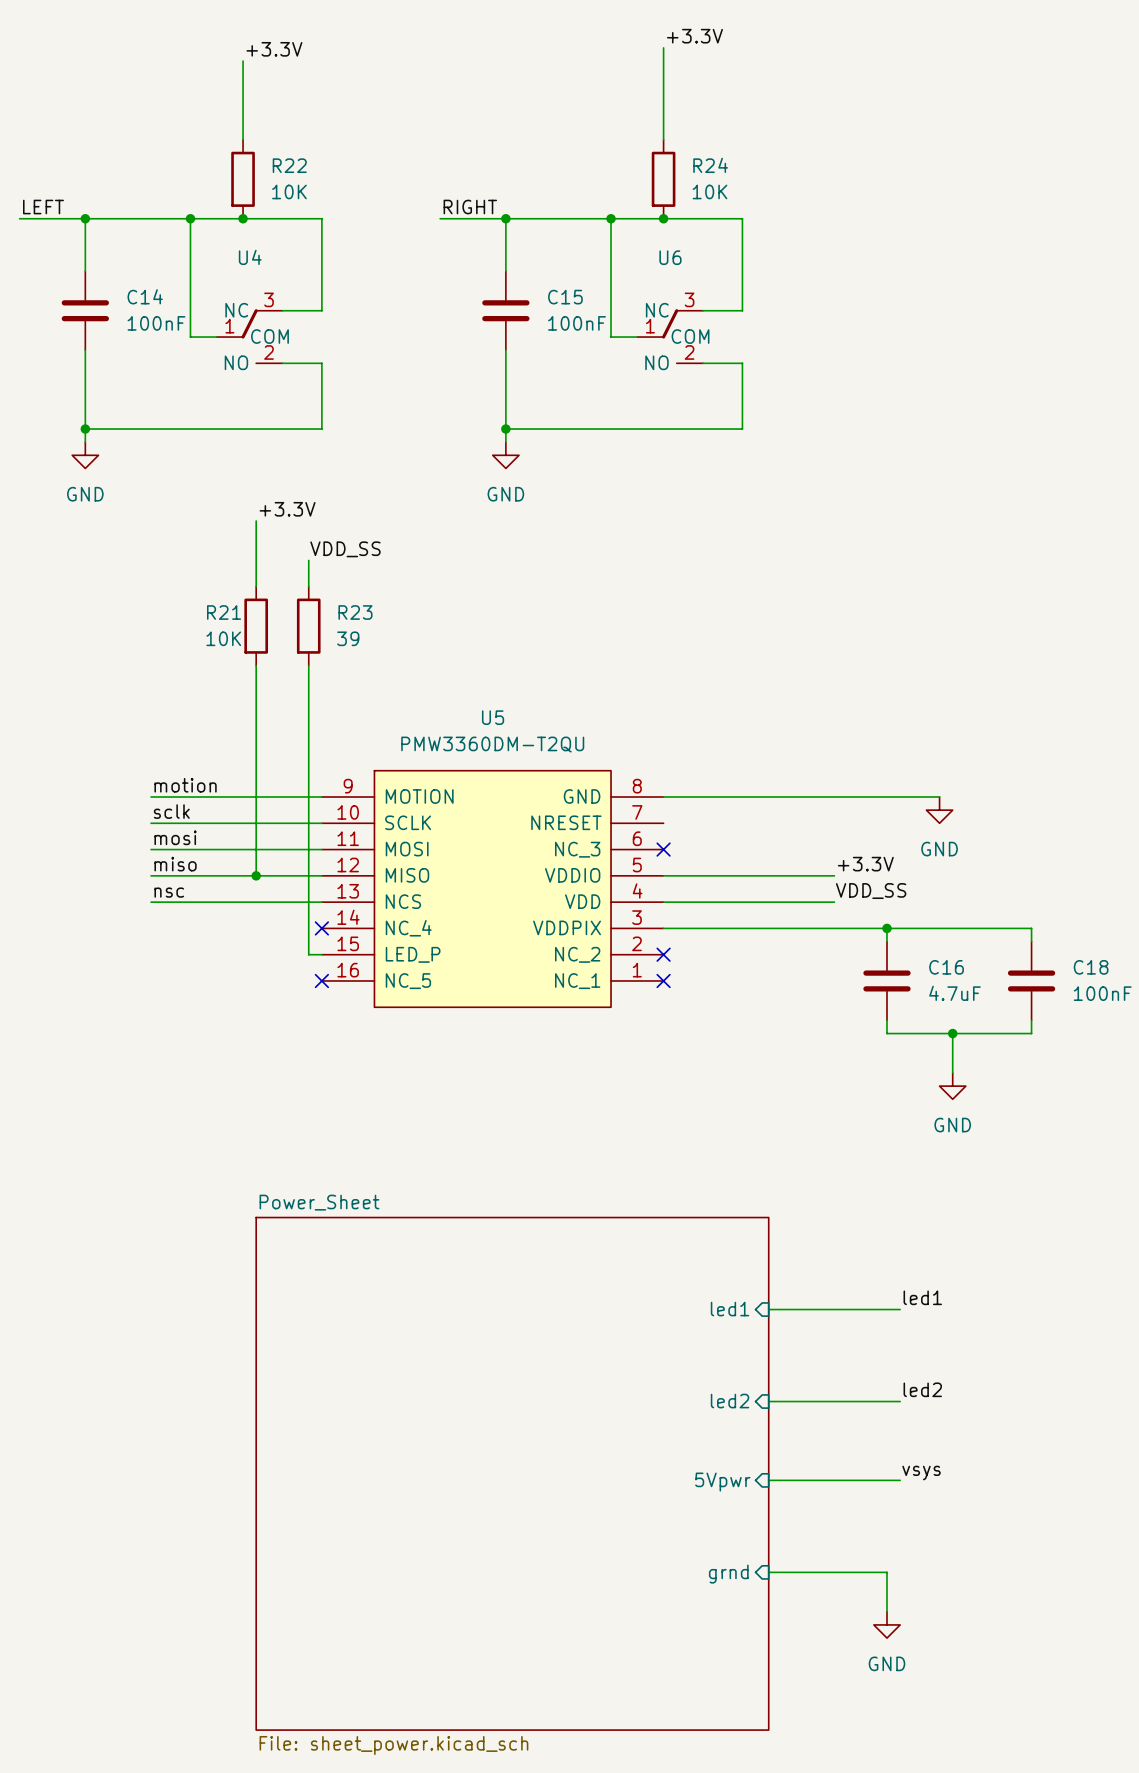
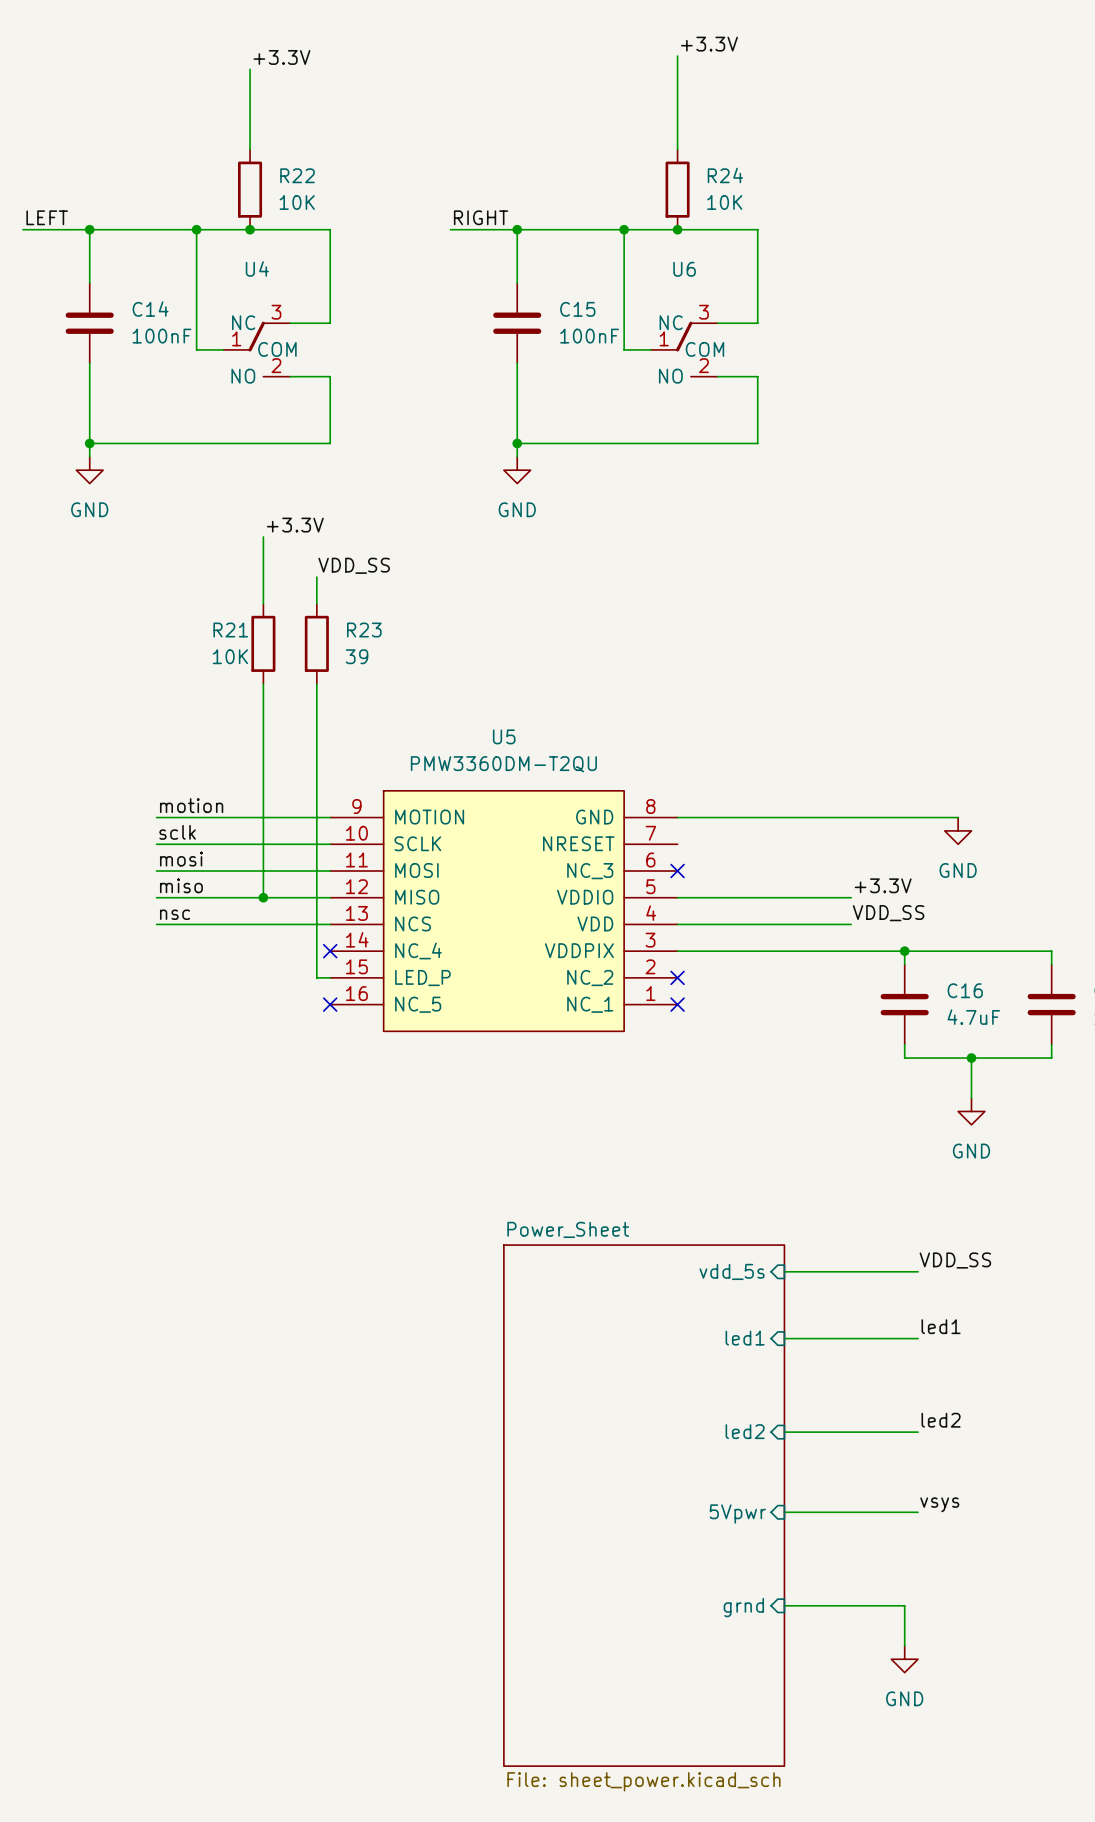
label: none -> VDD_SS (955, 1260)
sheet pin: none -> vdd_5s (732, 1271)
wire: none -> (784, 1271) (918, 1271)
sheet Power_Sheet: File: sheet_power.kicad_sch (512, 1473) -> none
sheet Power_Sheet: none -> File: sheet_power.kicad_sch (644, 1505)

